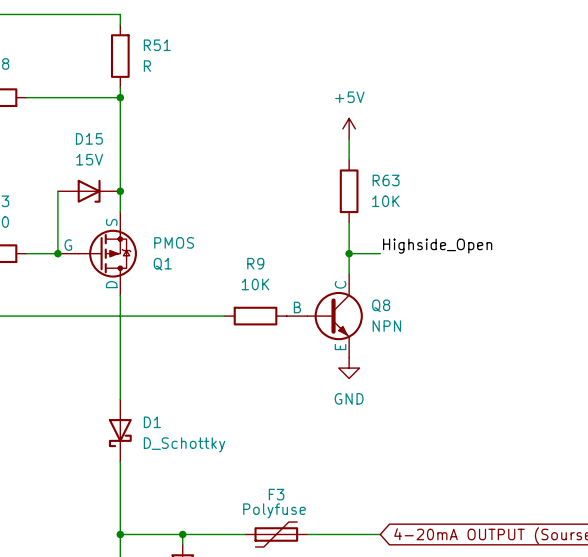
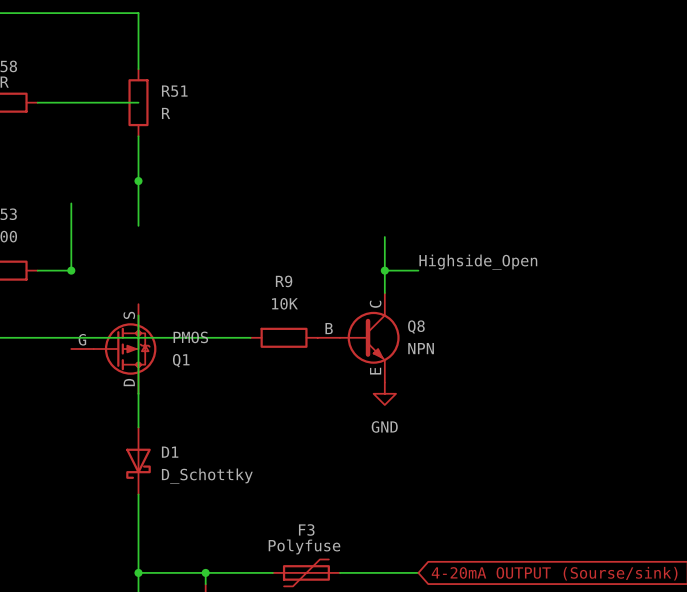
R51 position: (120, 56) -> (138, 102)
wire: (120, 87) (120, 128) -> (138, 24) (138, 69)
junction: (120, 97) -> none
power symbol: +5V (349, 128) -> none
wire: (349, 139) (349, 160) -> none
D15: 15V (89, 191) -> none
junction position: (120, 191) -> (138, 181)
R63: 10K (349, 191) -> none
Q1 position: (97, 253) -> (113, 349)

